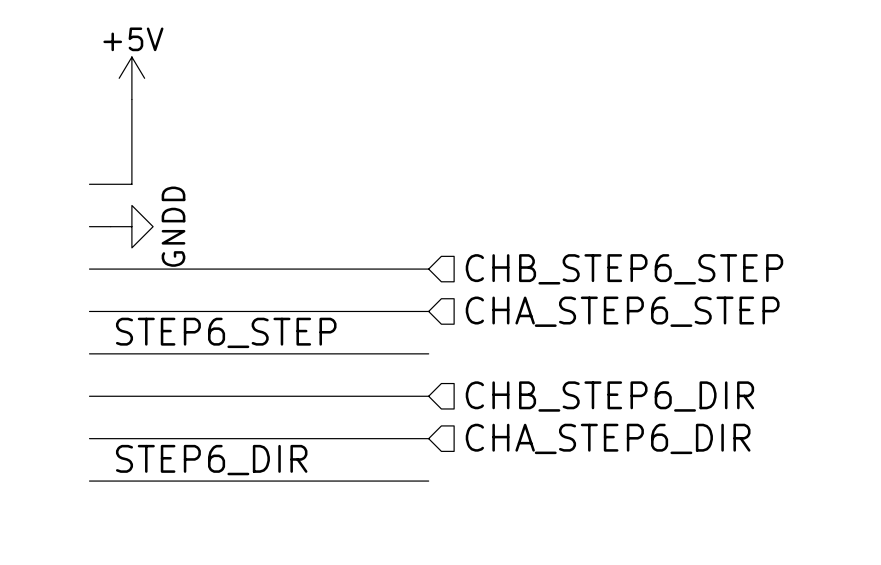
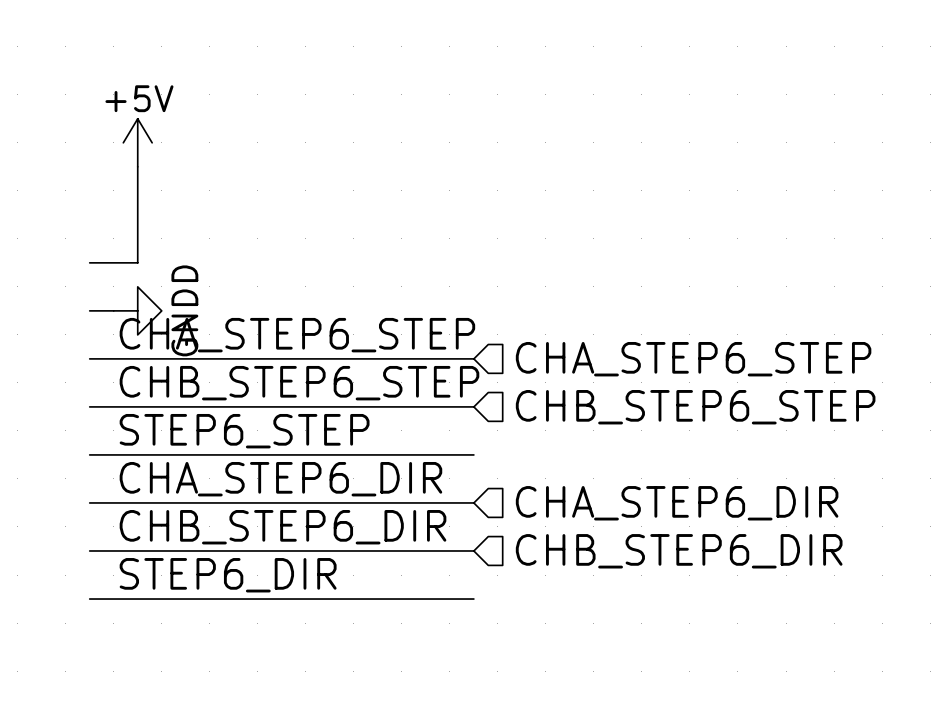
label: none -> CHA_STEP6_STEP (297, 335)
hierarchical label: CHB_STEP6_STEP (624, 269) -> CHA_STEP6_STEP (693, 359)
label: none -> CHB_STEP6_STEP (299, 383)
hierarchical label: CHA_STEP6_STEP (622, 311) -> CHB_STEP6_STEP (695, 407)
label: none -> CHA_STEP6_DIR (280, 479)
hierarchical label: CHB_STEP6_DIR (609, 396) -> CHA_STEP6_DIR (677, 503)
label: none -> CHB_STEP6_DIR (283, 527)
hierarchical label: CHA_STEP6_DIR (608, 438) -> CHB_STEP6_DIR (679, 551)

